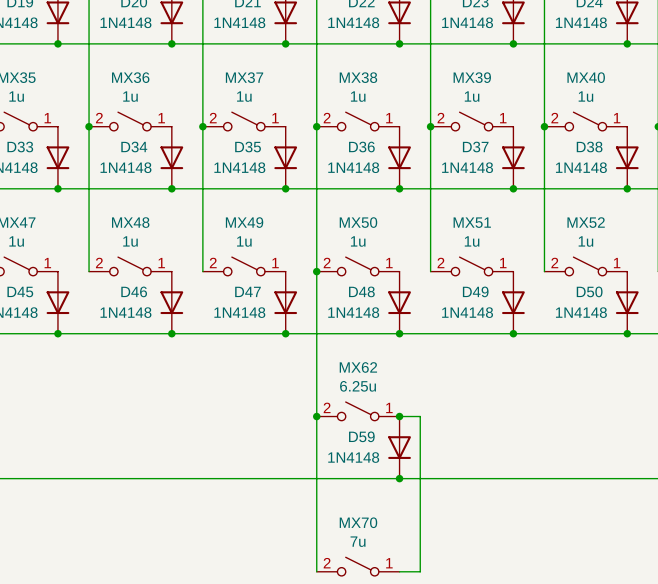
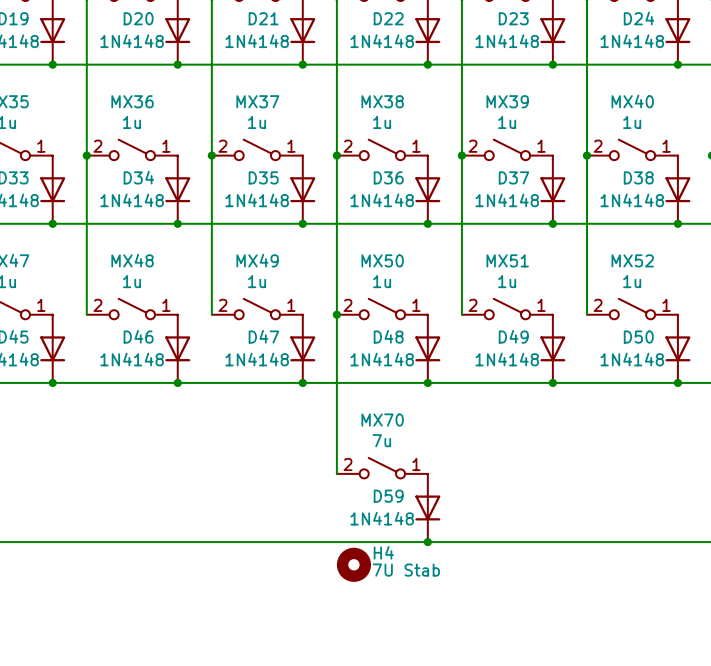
MX62 name: MX62 (358, 367) -> MX70 (382, 420)
MX62 value: 6.25u (358, 386) -> 7u (381, 440)
wire: (316, 416) (316, 571) -> none
junction: (316, 416) -> none
wire: (399, 416) (420, 416) (420, 571) (399, 571) -> none
junction: (399, 416) -> none
H4: none -> 7U Stab (353, 564)
MX70: 7u (358, 566) -> none

